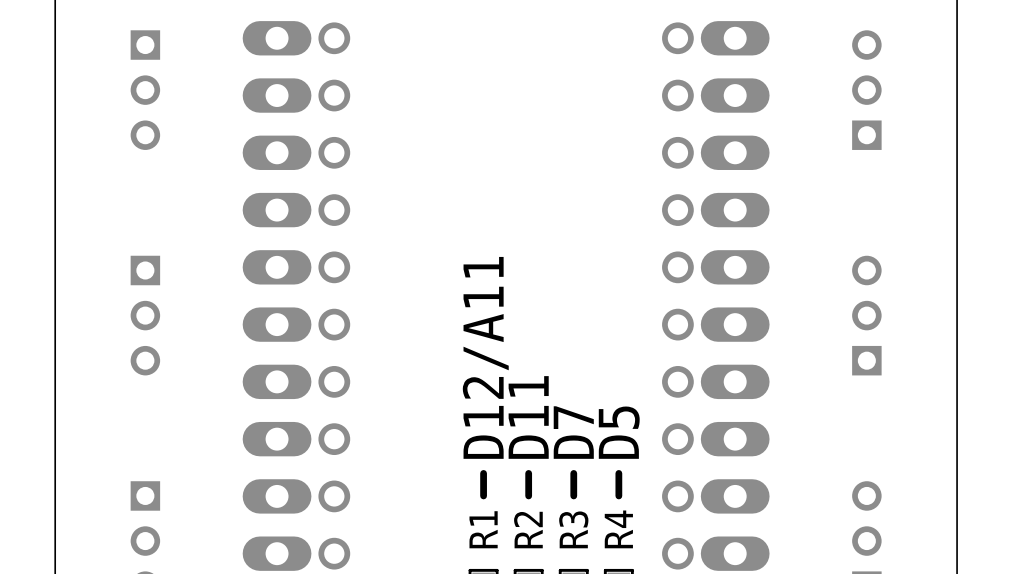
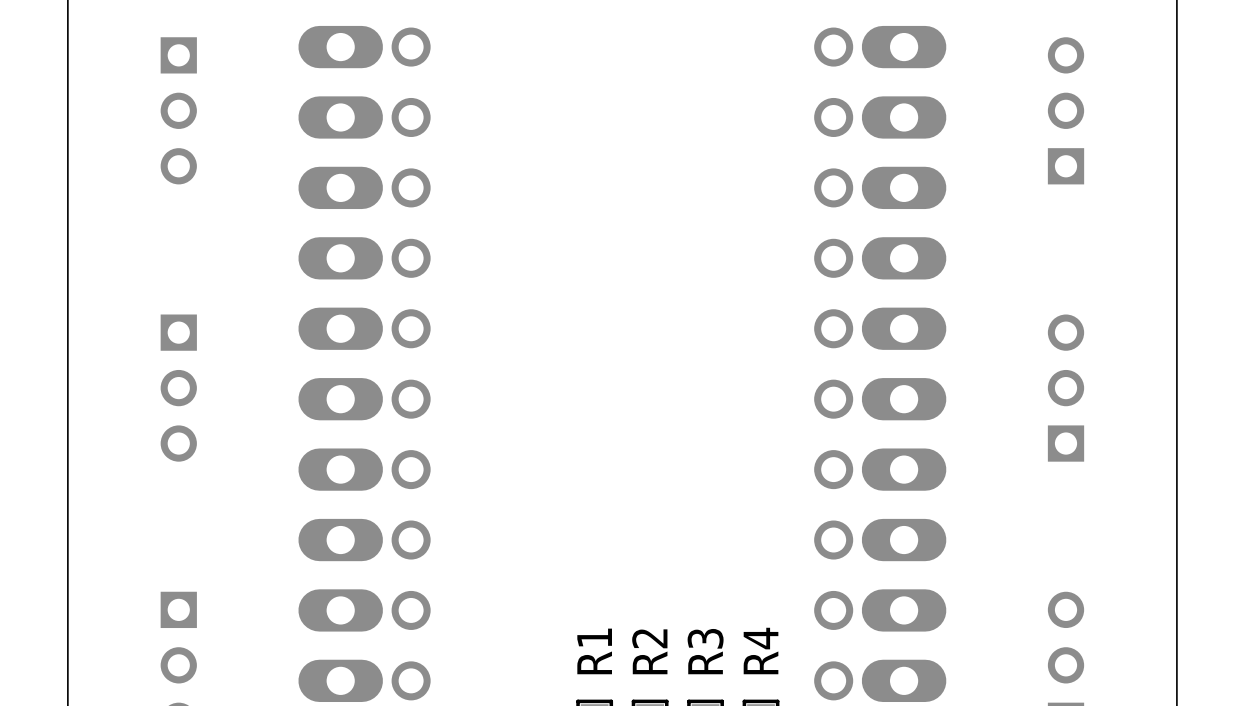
text: D12/A11 (485, 357) -> none
text: D11 (528, 417) -> none
text: D7 (573, 432) -> none
text: D5 (619, 432) -> none
line: (483, 473) (483, 495) -> none
line: (528, 473) (528, 495) -> none
line: (573, 473) (573, 495) -> none
line: (618, 473) (618, 495) -> none

